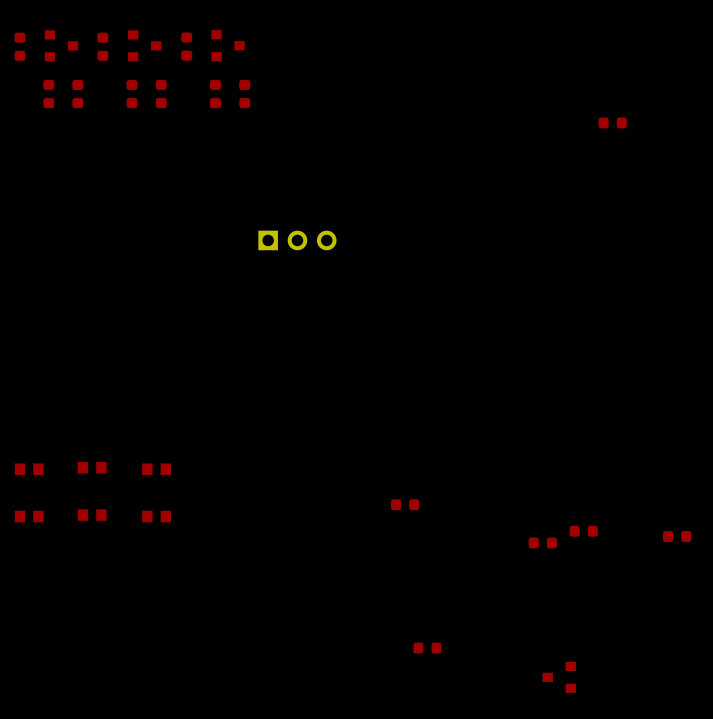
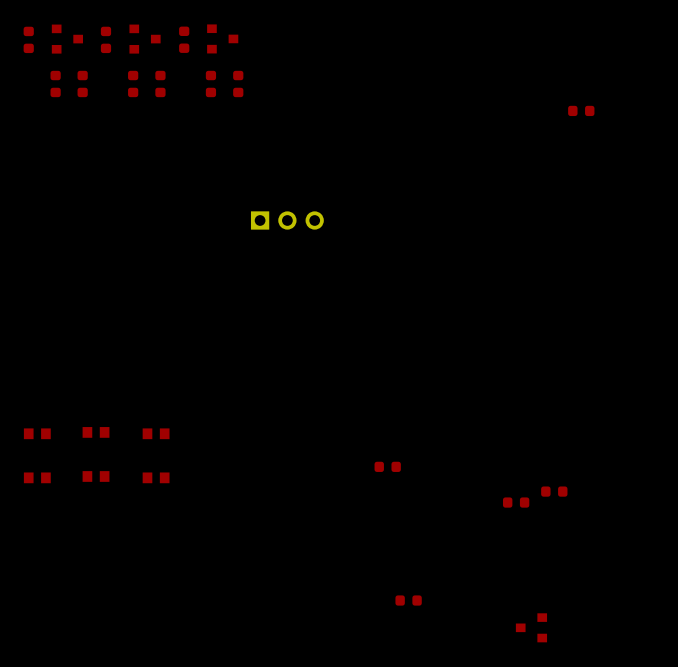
part: (677, 536) -> none

